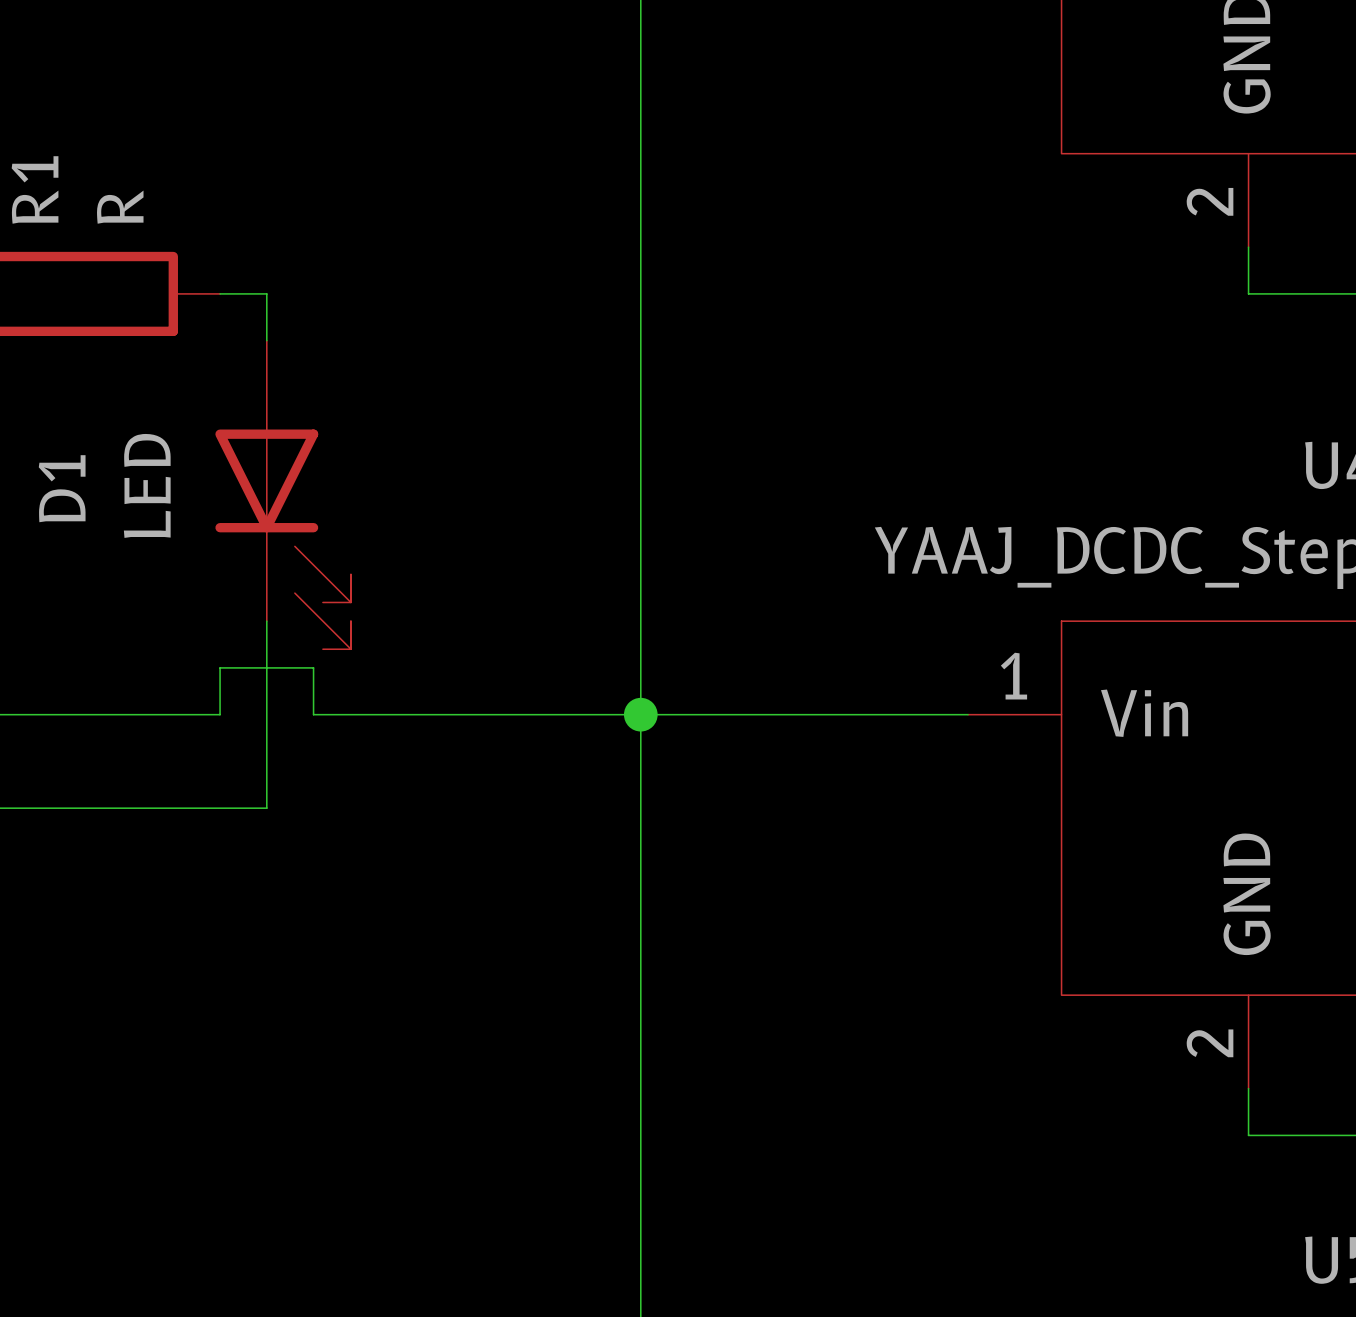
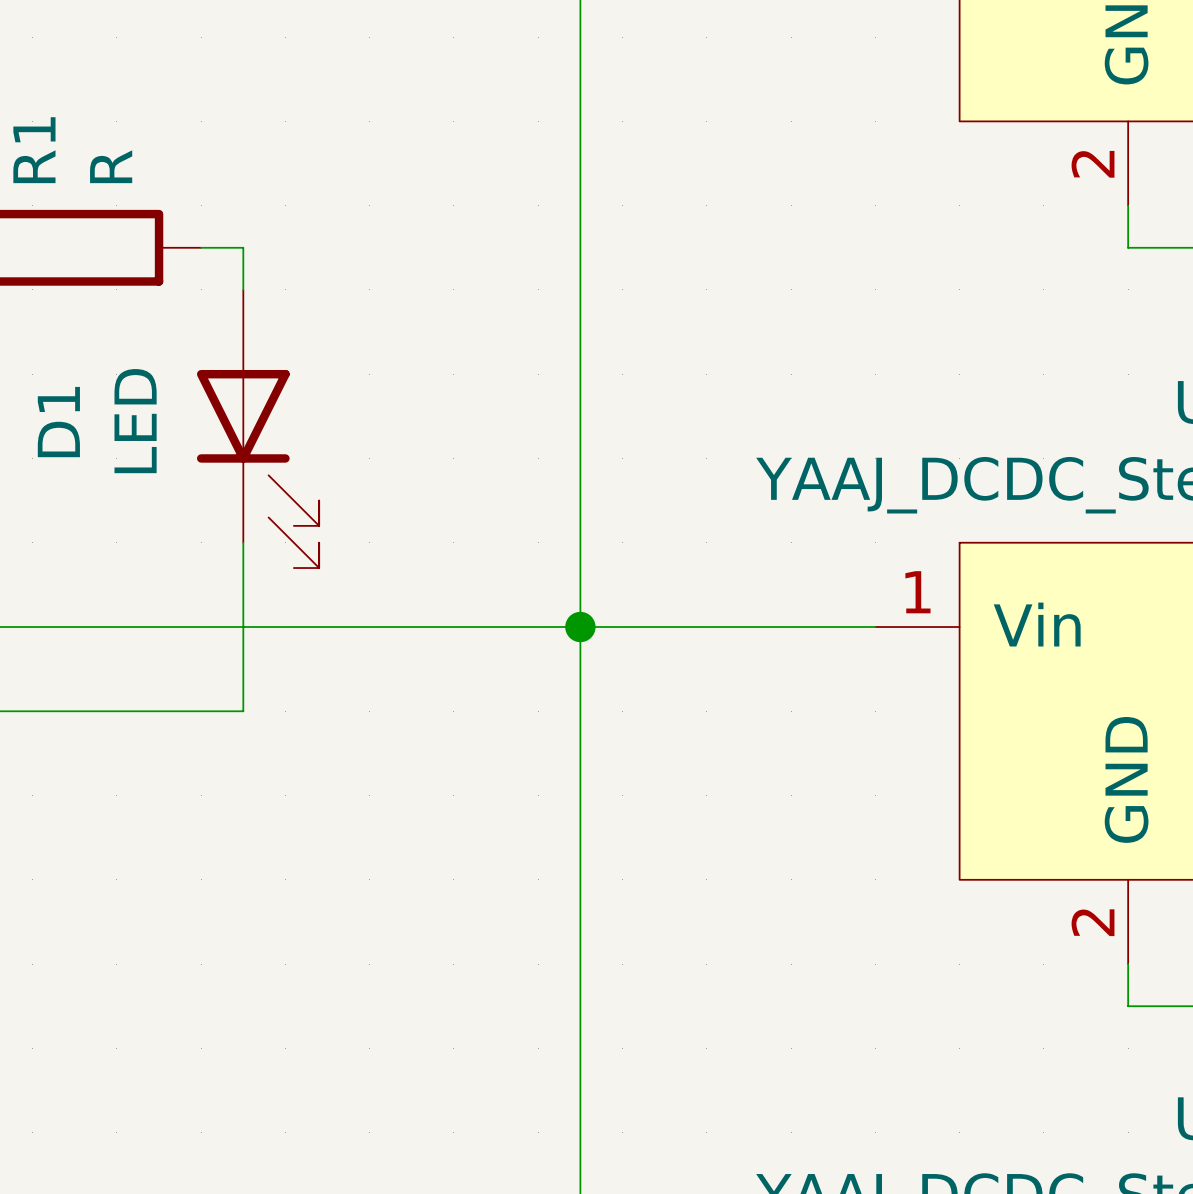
wire: (220, 714) (220, 667) (313, 667) (313, 714) -> (201, 627) (285, 627)

